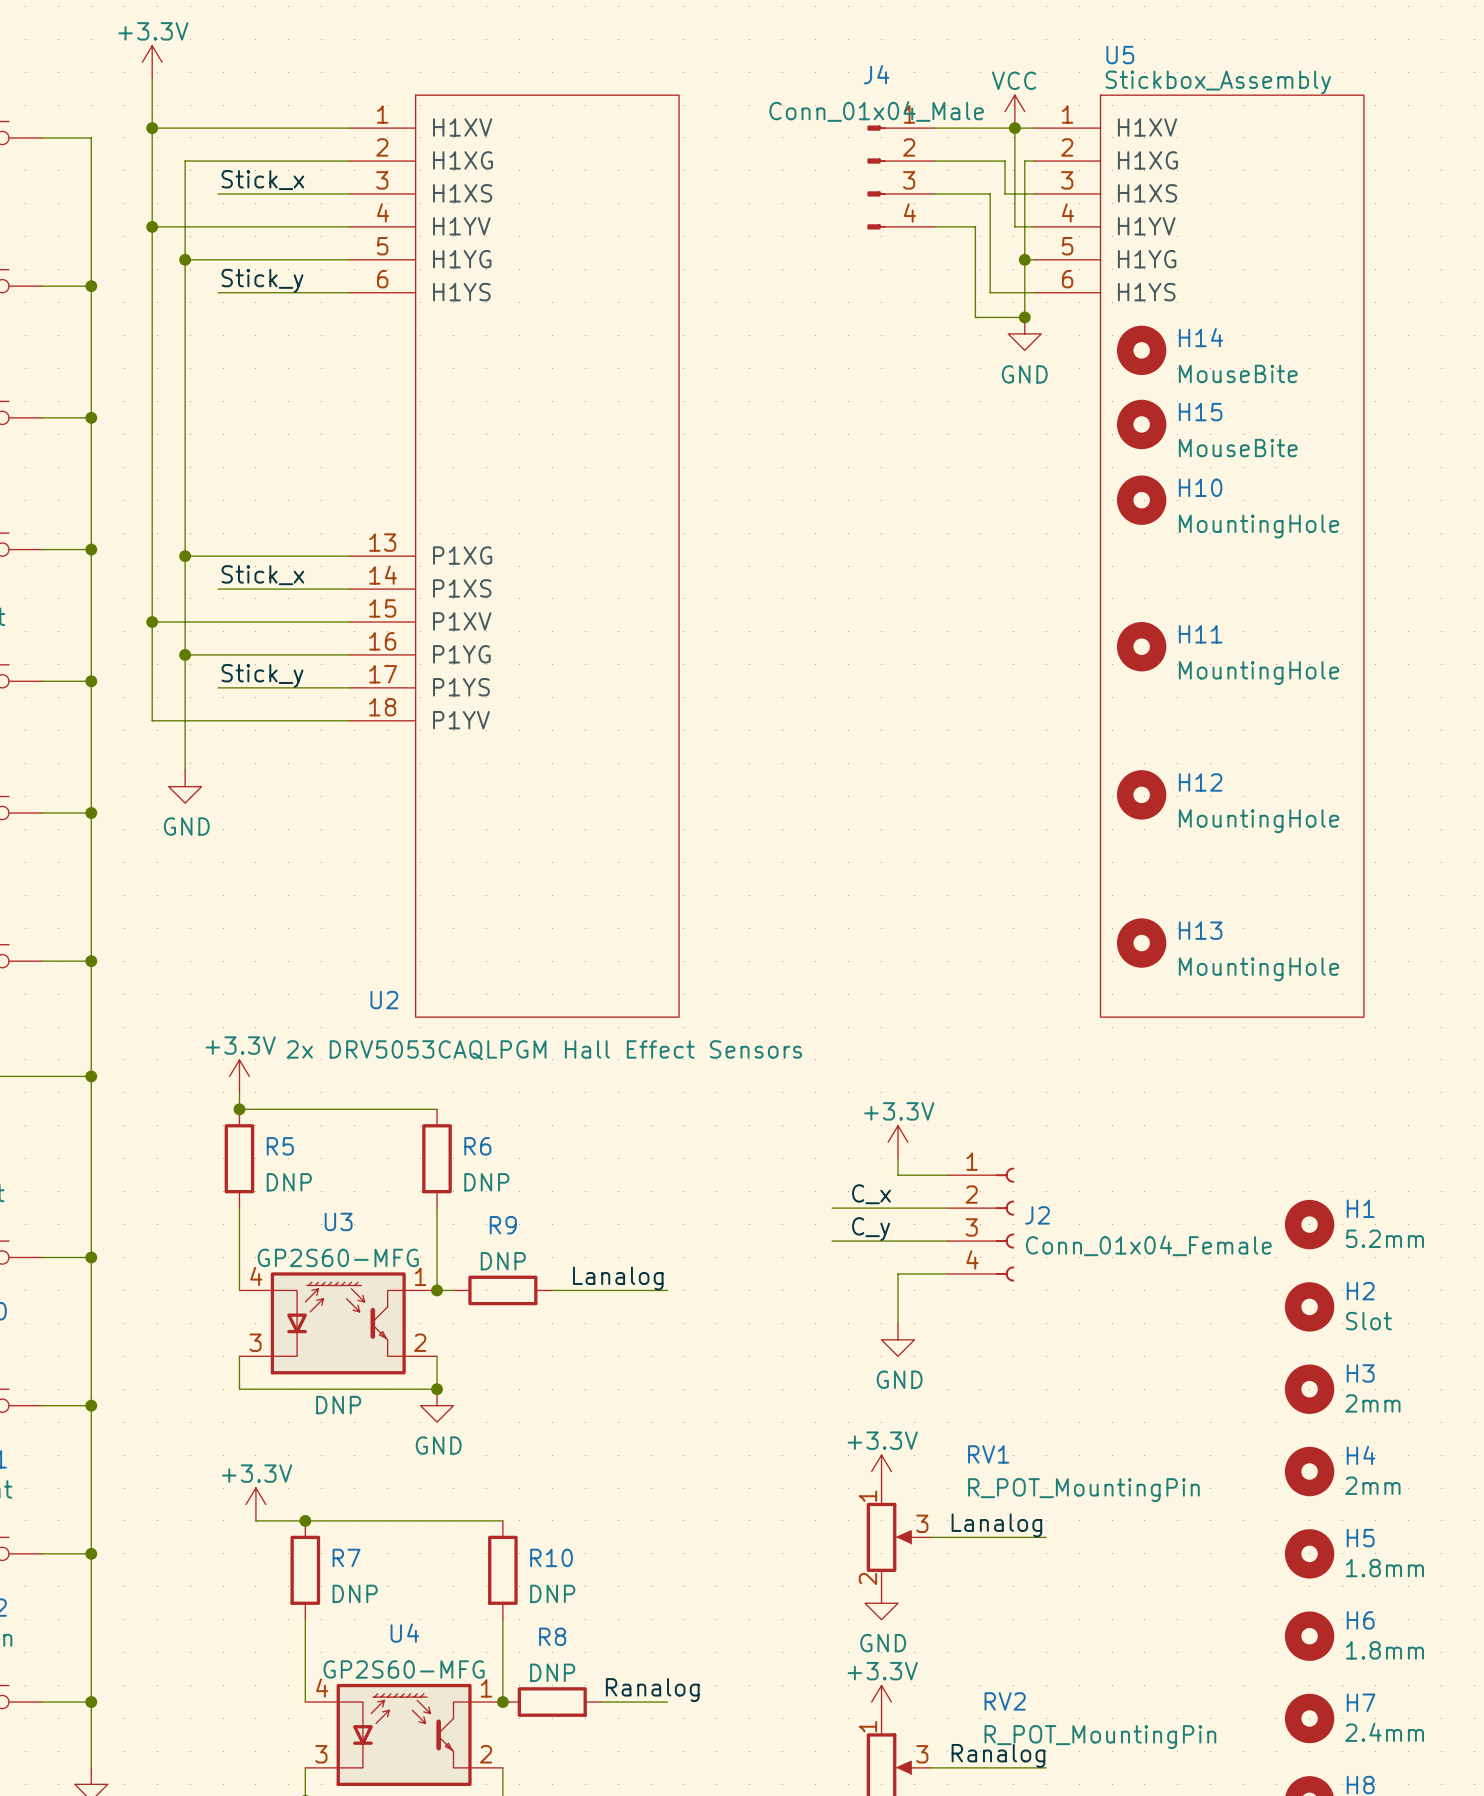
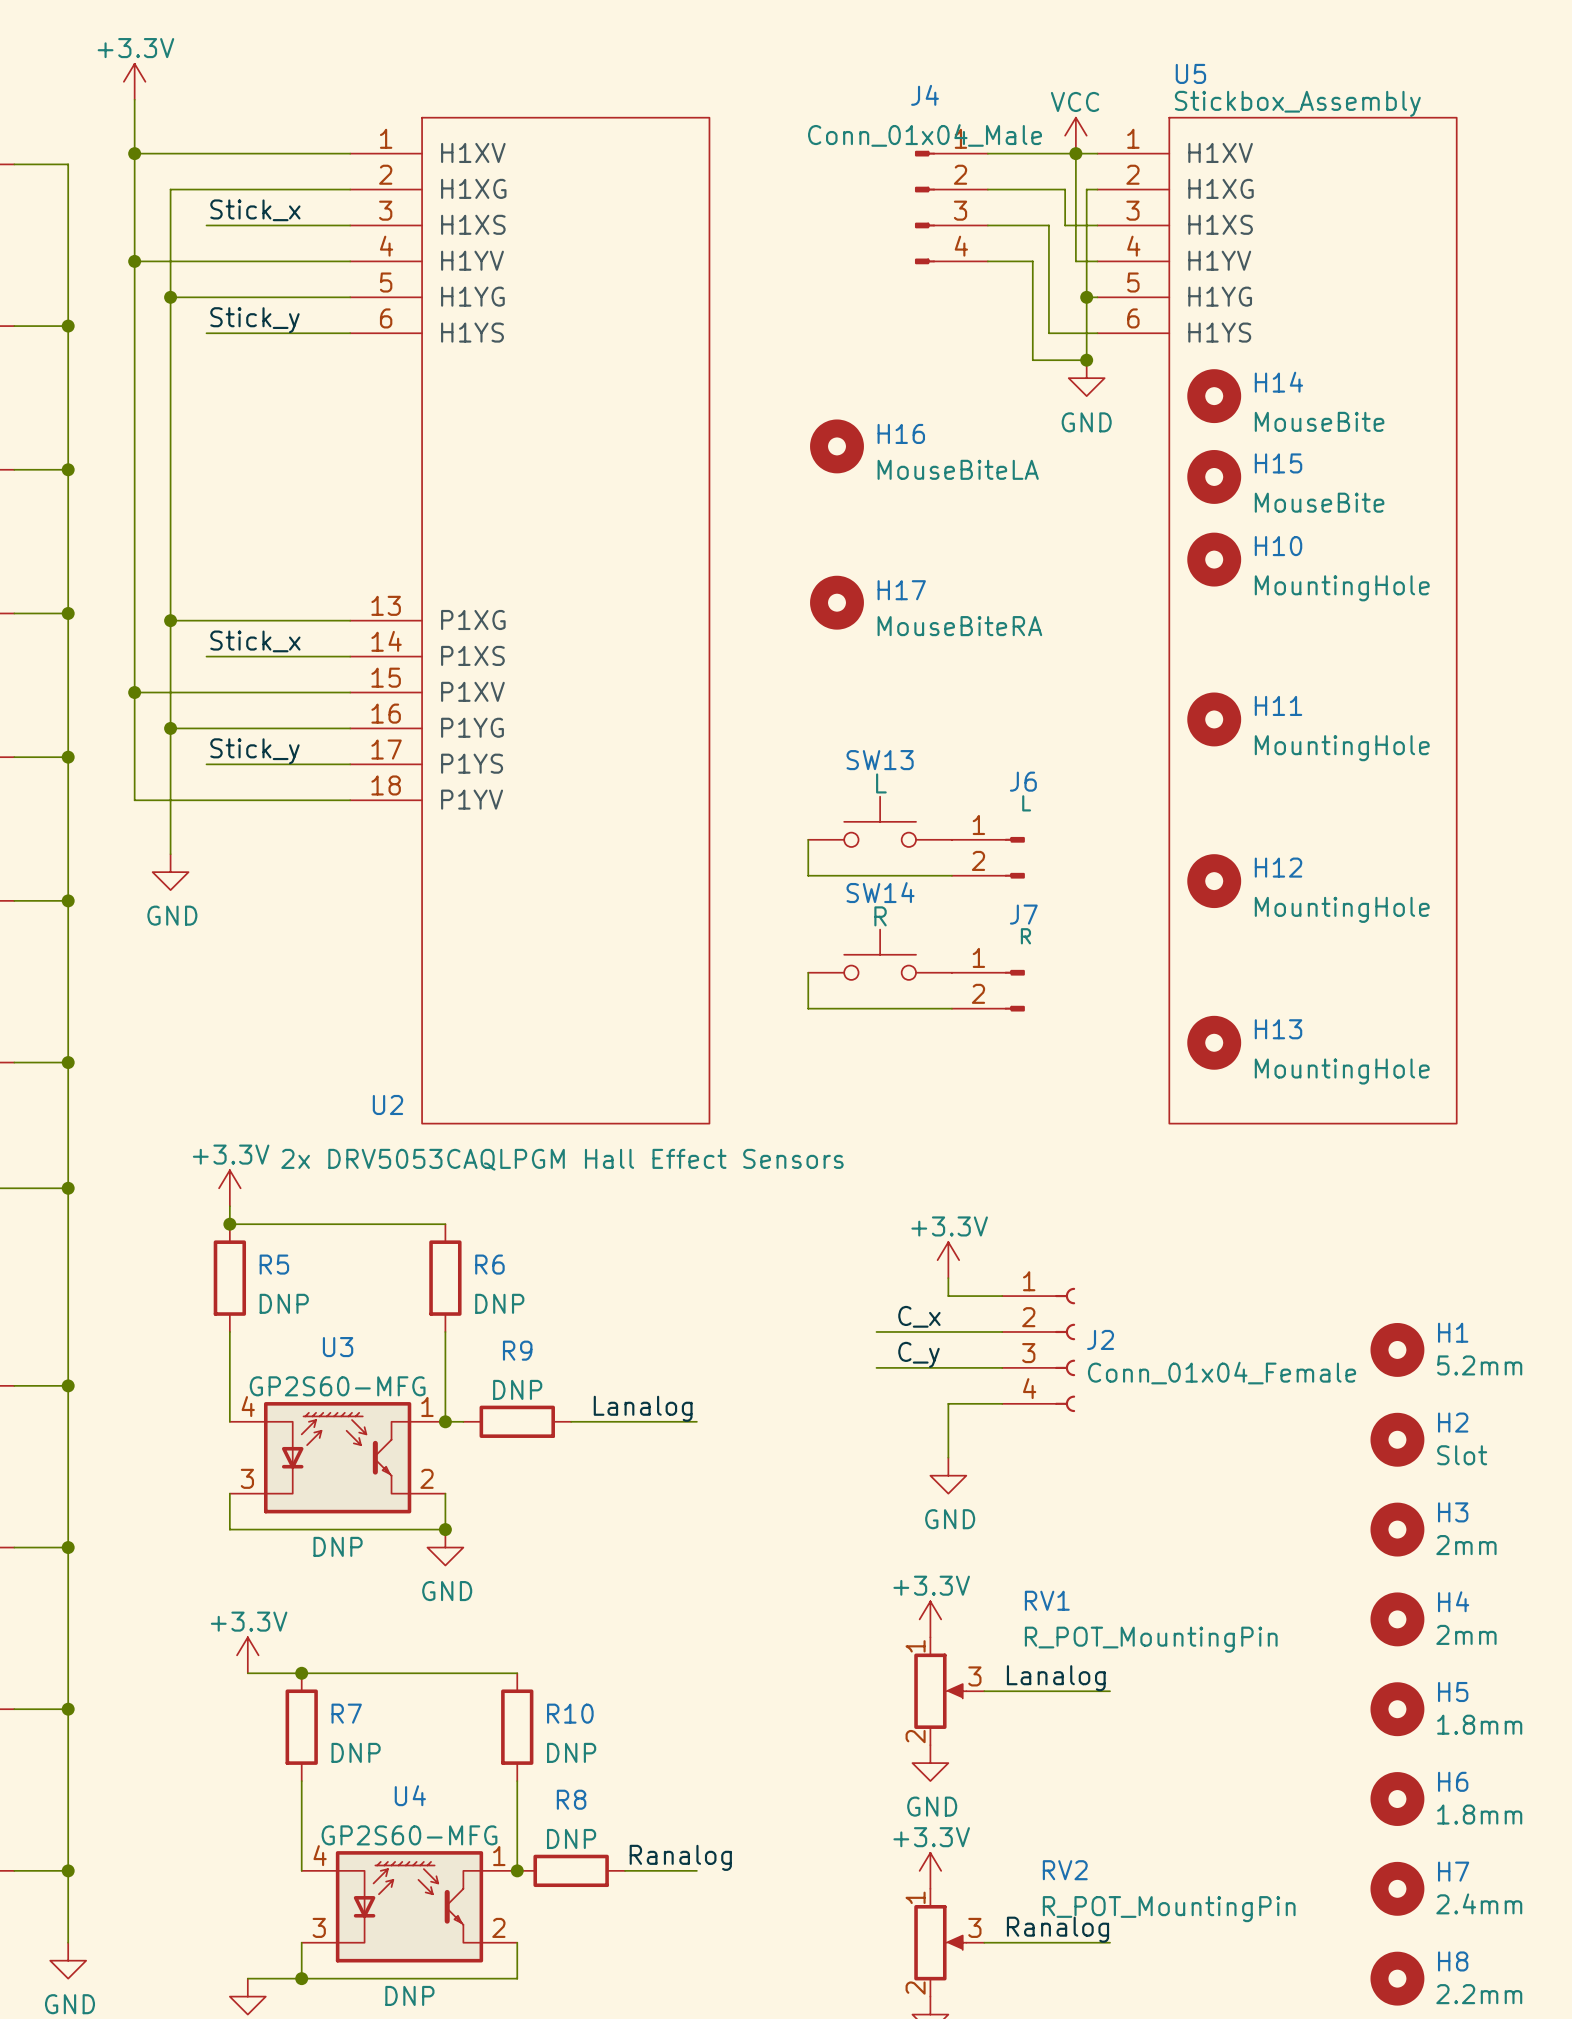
H16: none -> MouseBiteLA (837, 446)
H17: none -> MouseBiteRA (837, 602)
SW13: none -> L (880, 821)
wire: none -> (808, 839) (808, 875) (951, 875)
J6: none -> L (988, 857)
SW14: none -> R (880, 954)
wire: none -> (808, 972) (808, 1008) (951, 1008)
J7: none -> R (988, 990)

